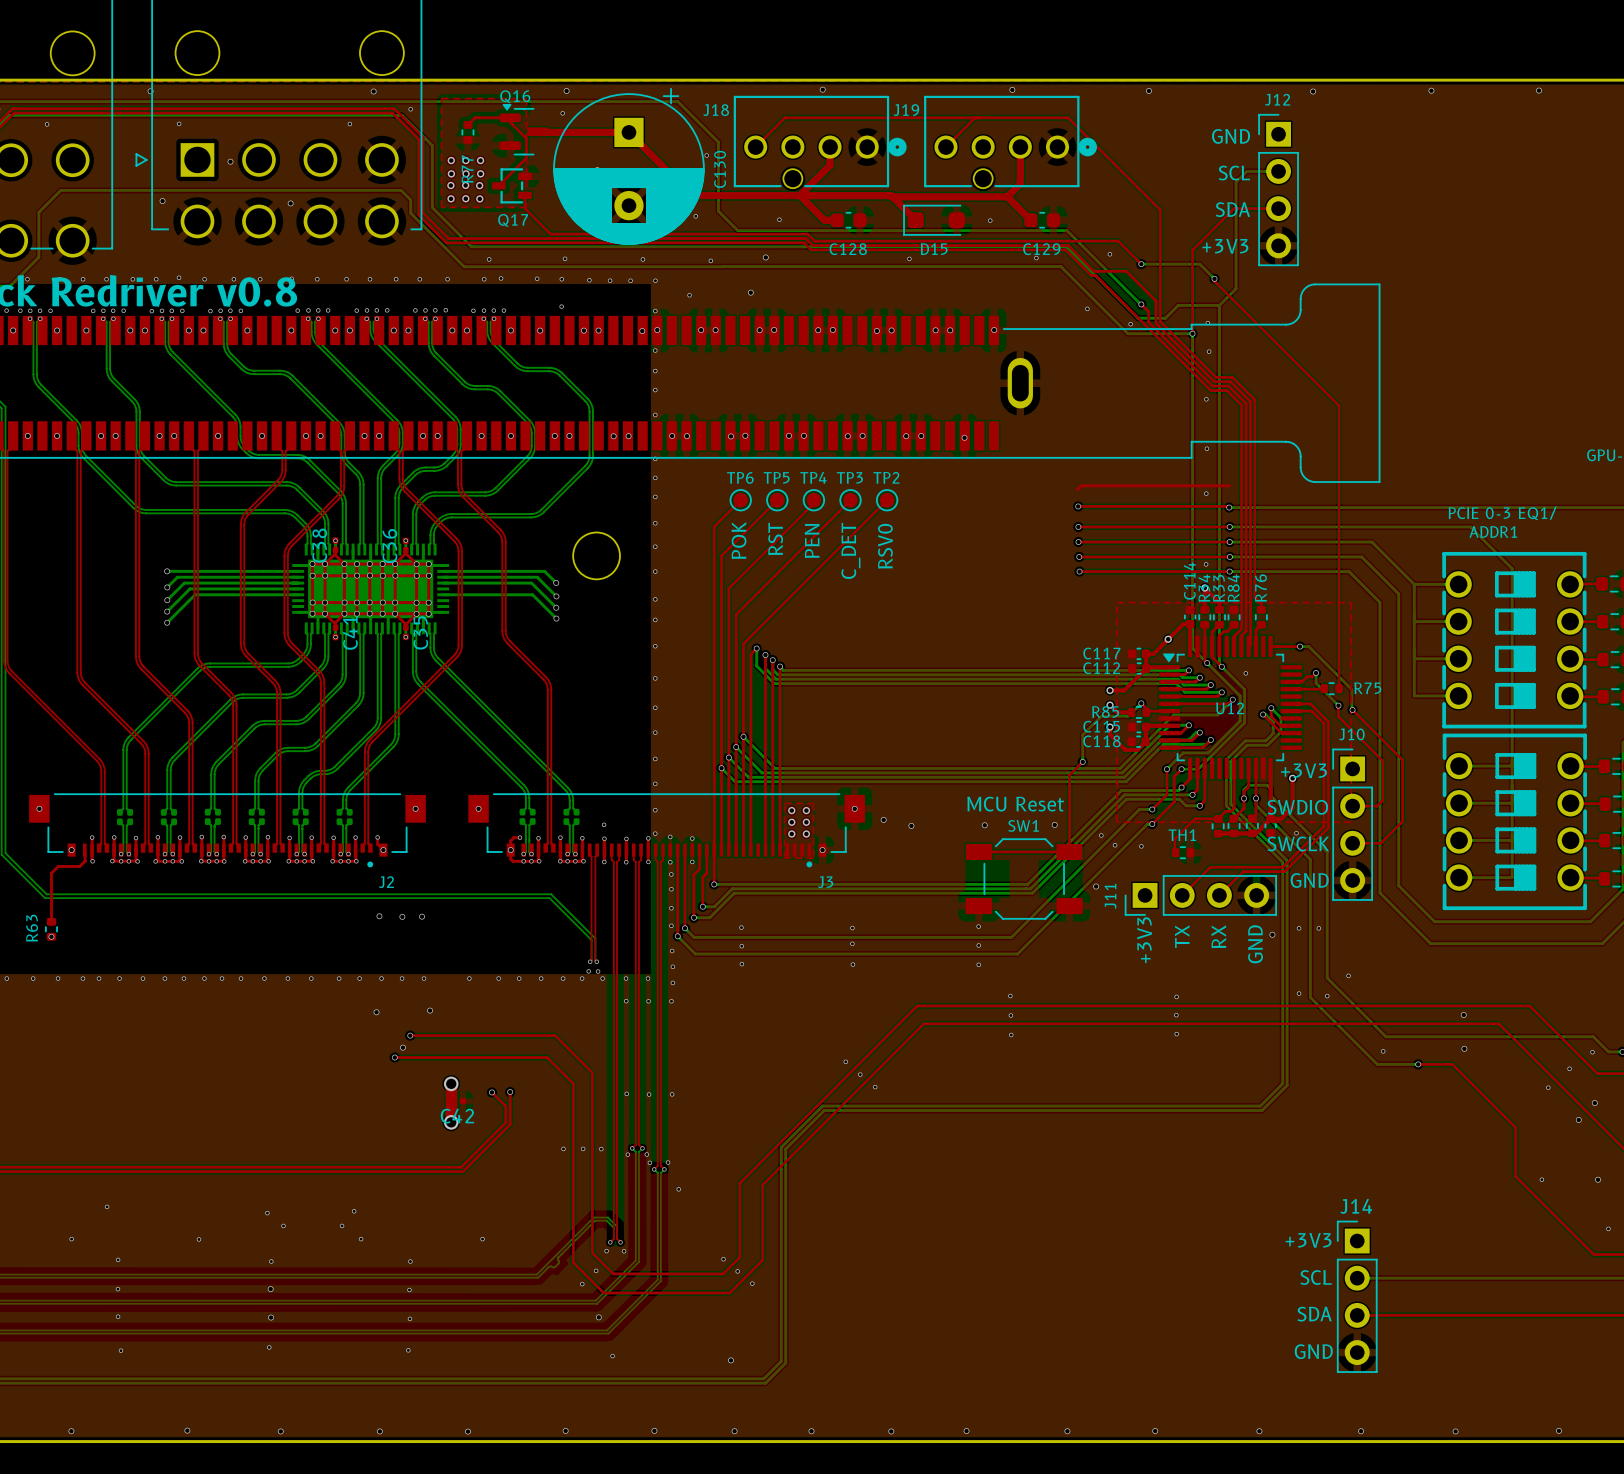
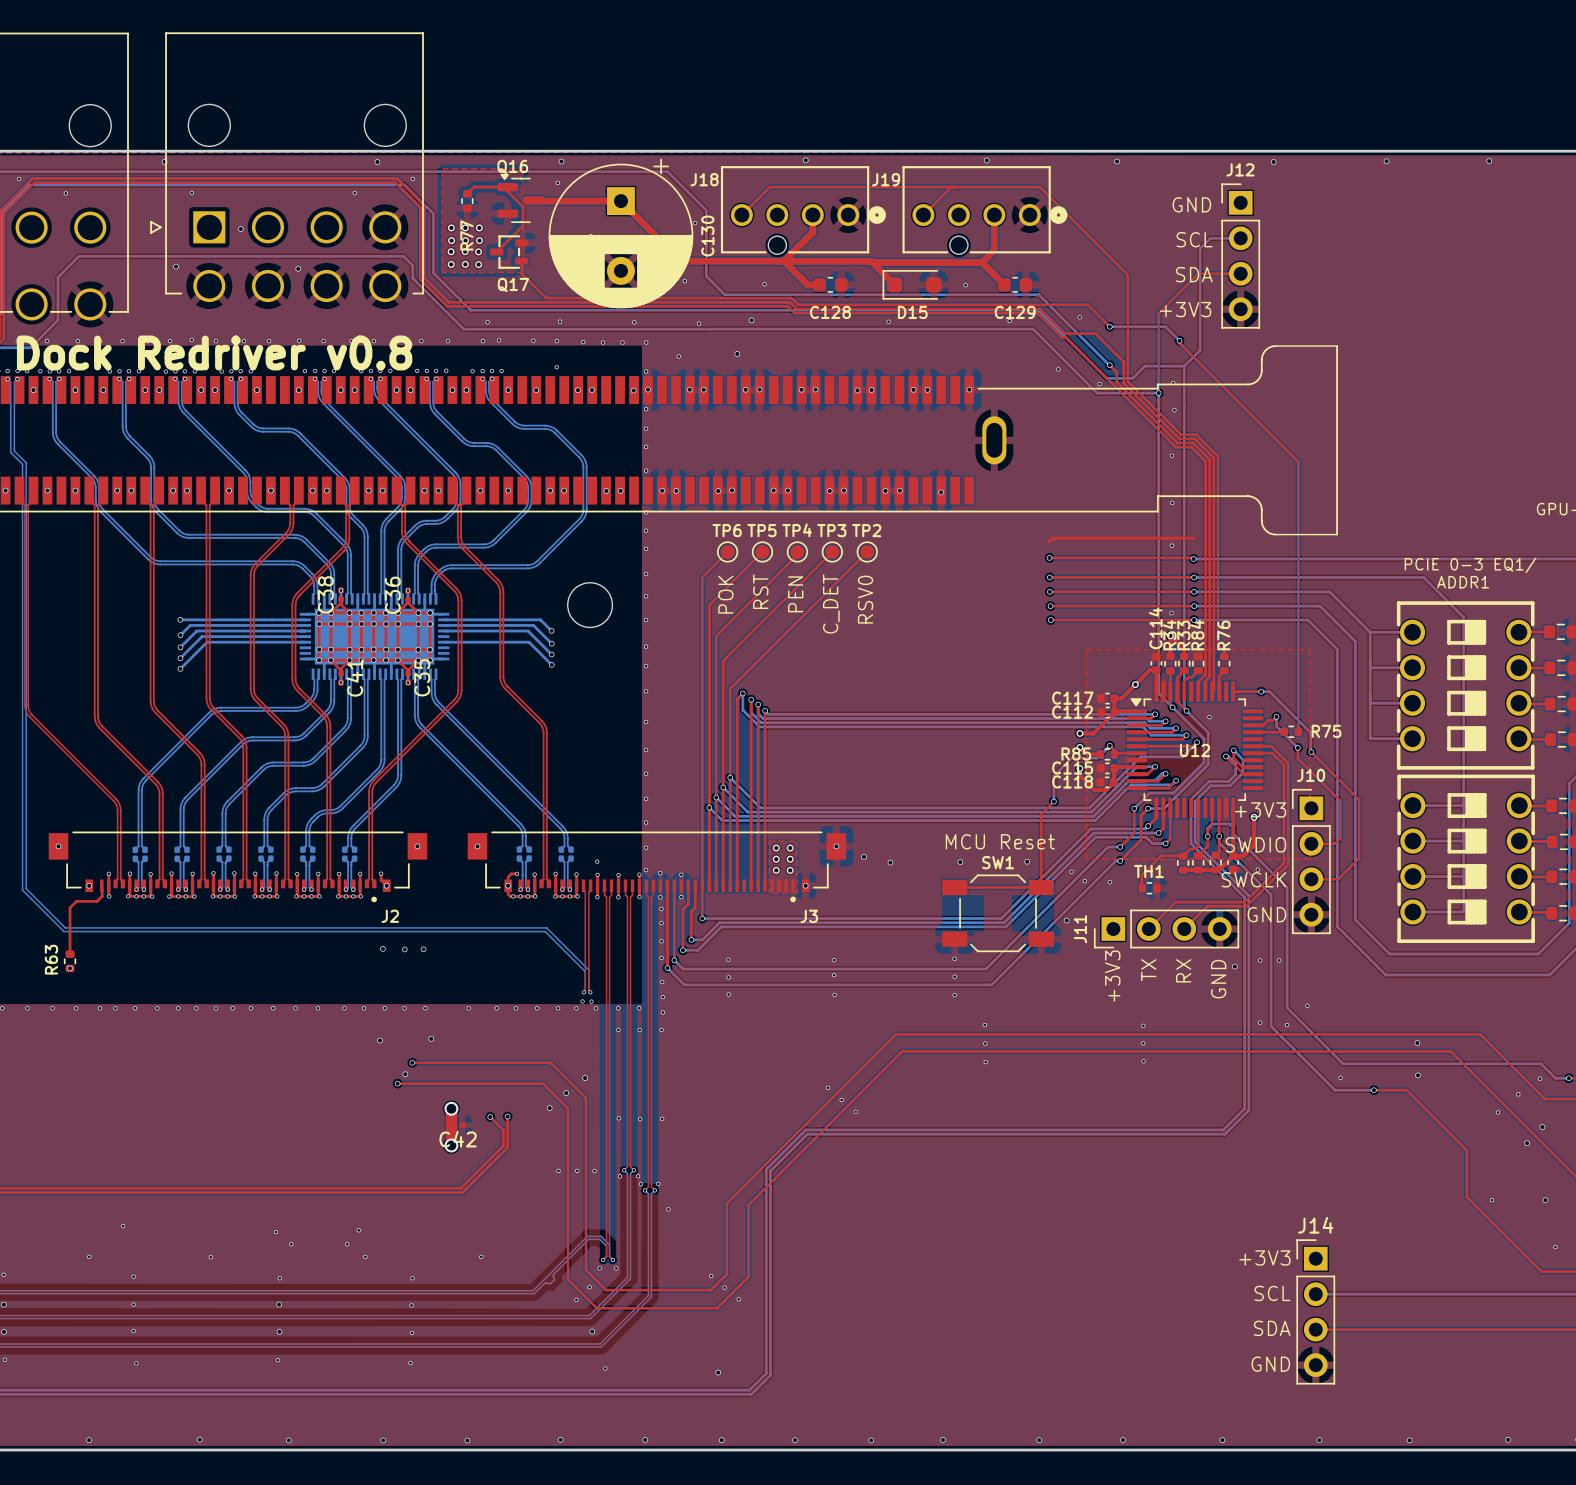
via: none -> (513, 896)
via: none -> (585, 1078)
via: none -> (566, 1093)
via: none -> (549, 1108)

